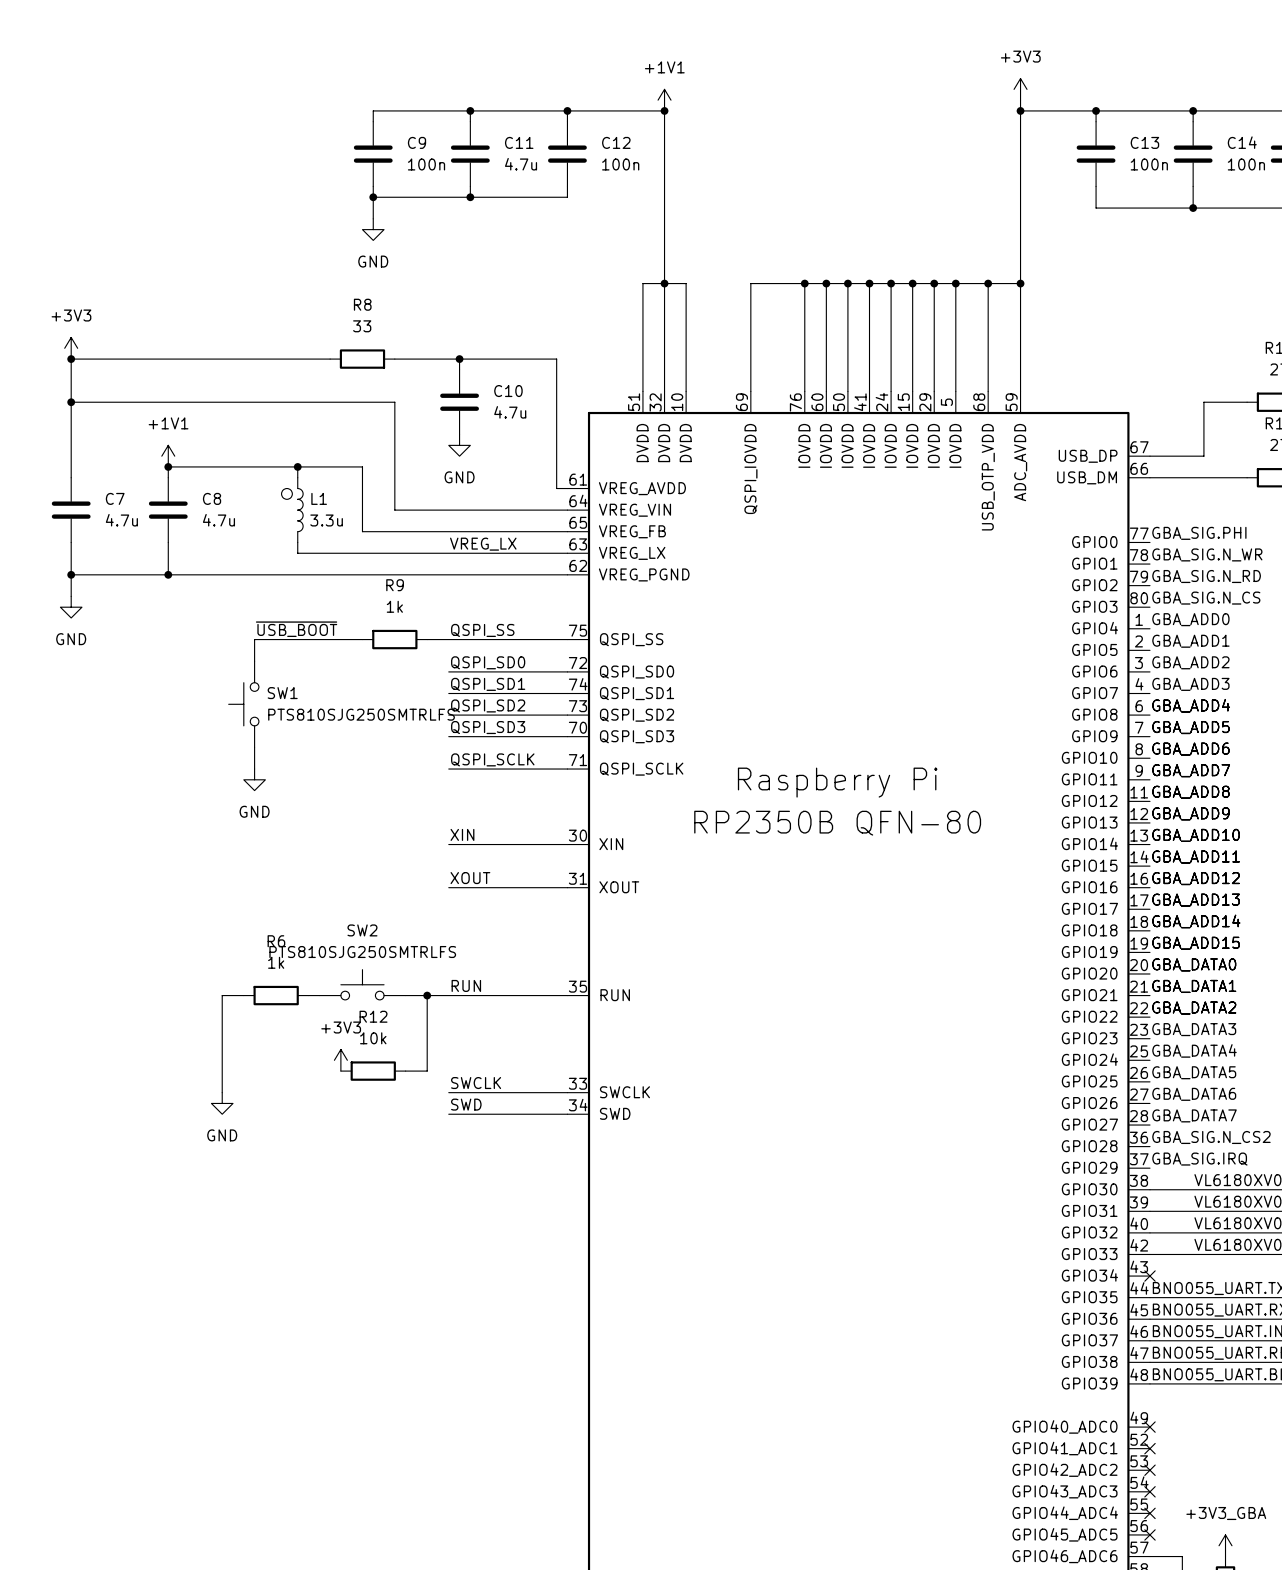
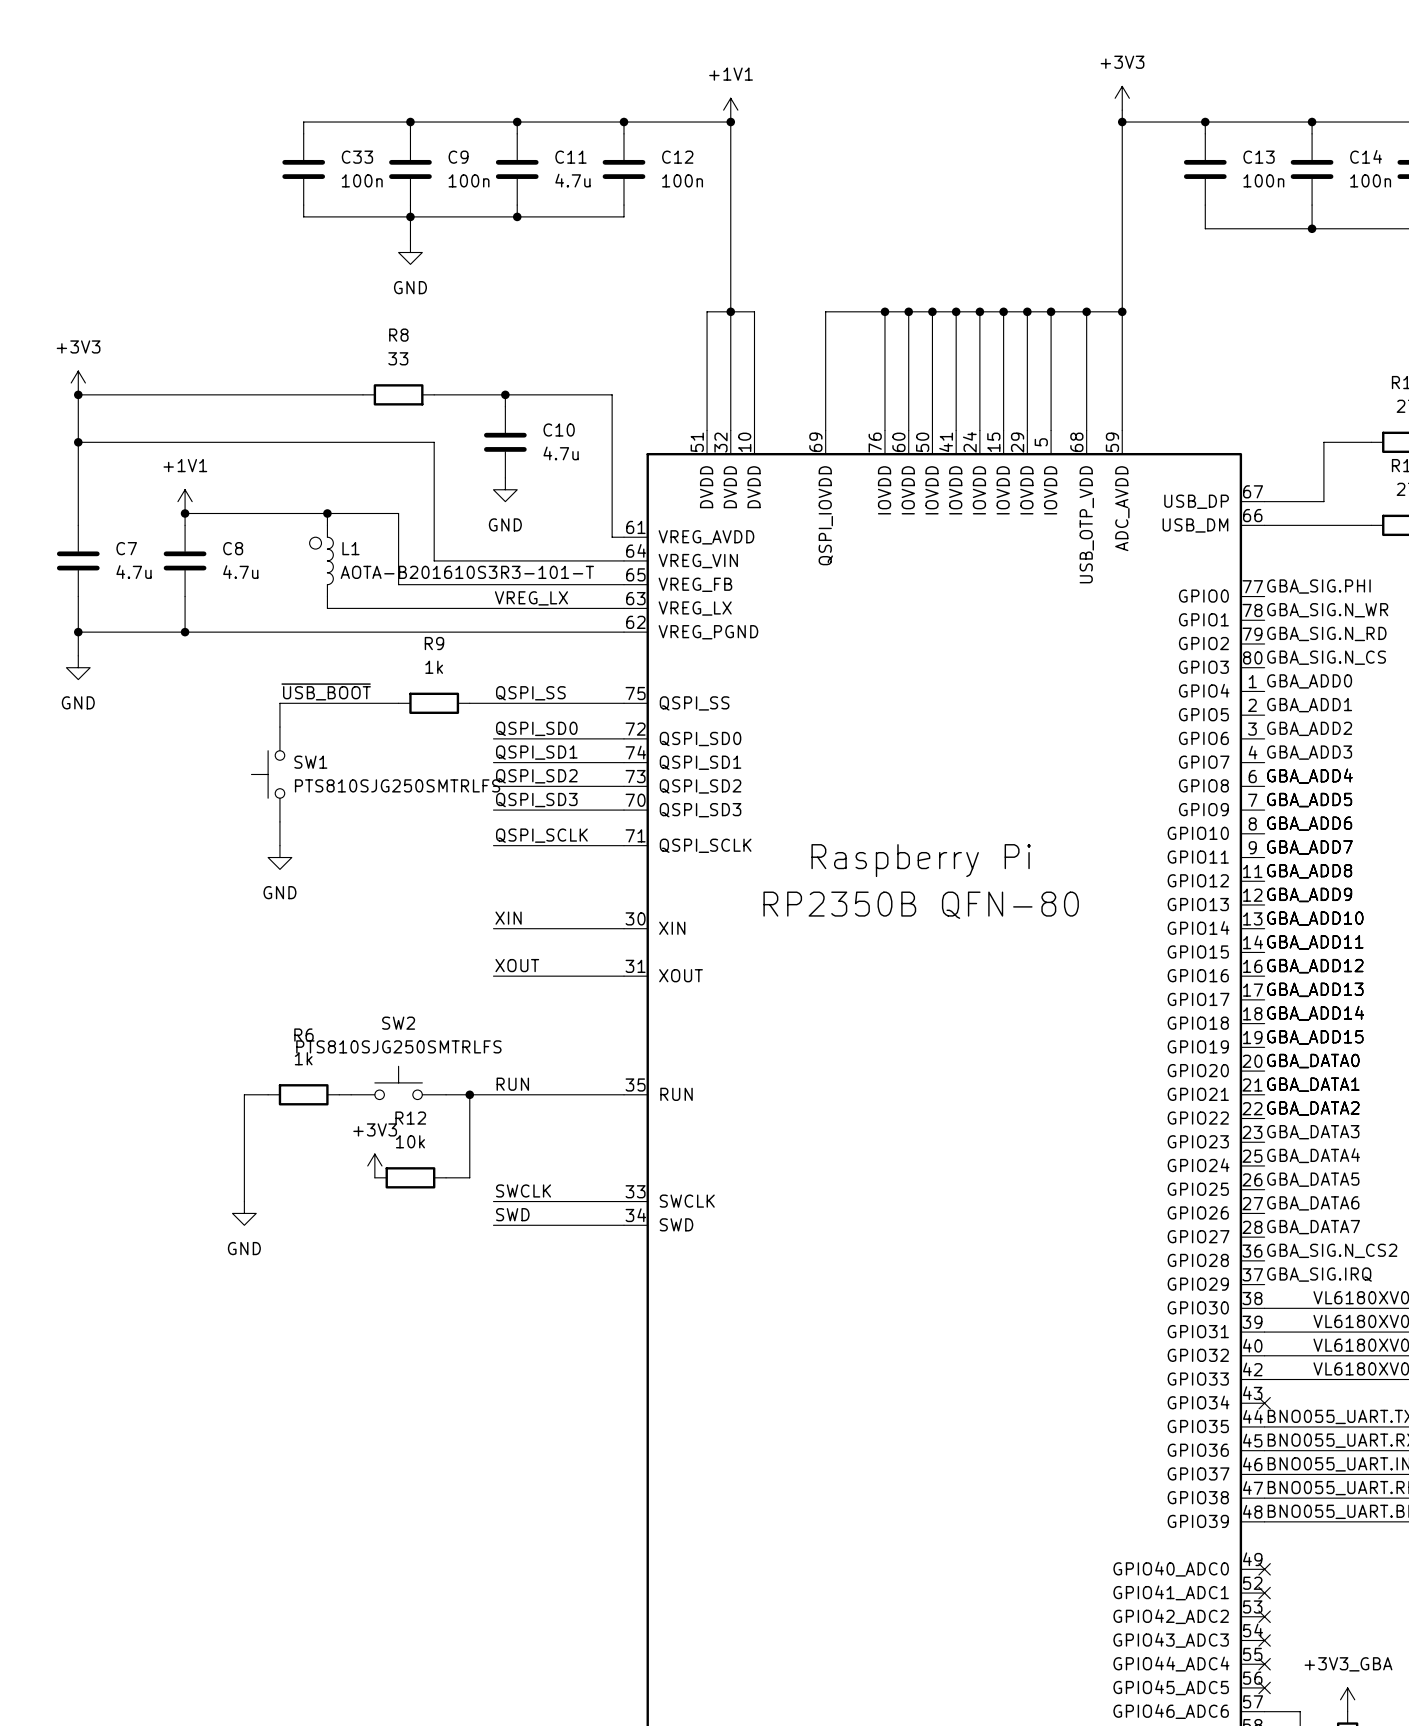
wire: none -> (410, 122) (303, 122) (303, 133)
junction: none -> (410, 122)
C33: none -> 100n (303, 169)
wire: none -> (303, 205) (303, 216) (410, 216)
L1 value: 3.3u (326, 520) -> AOTA-B201610S3R3-101-T (467, 572)

